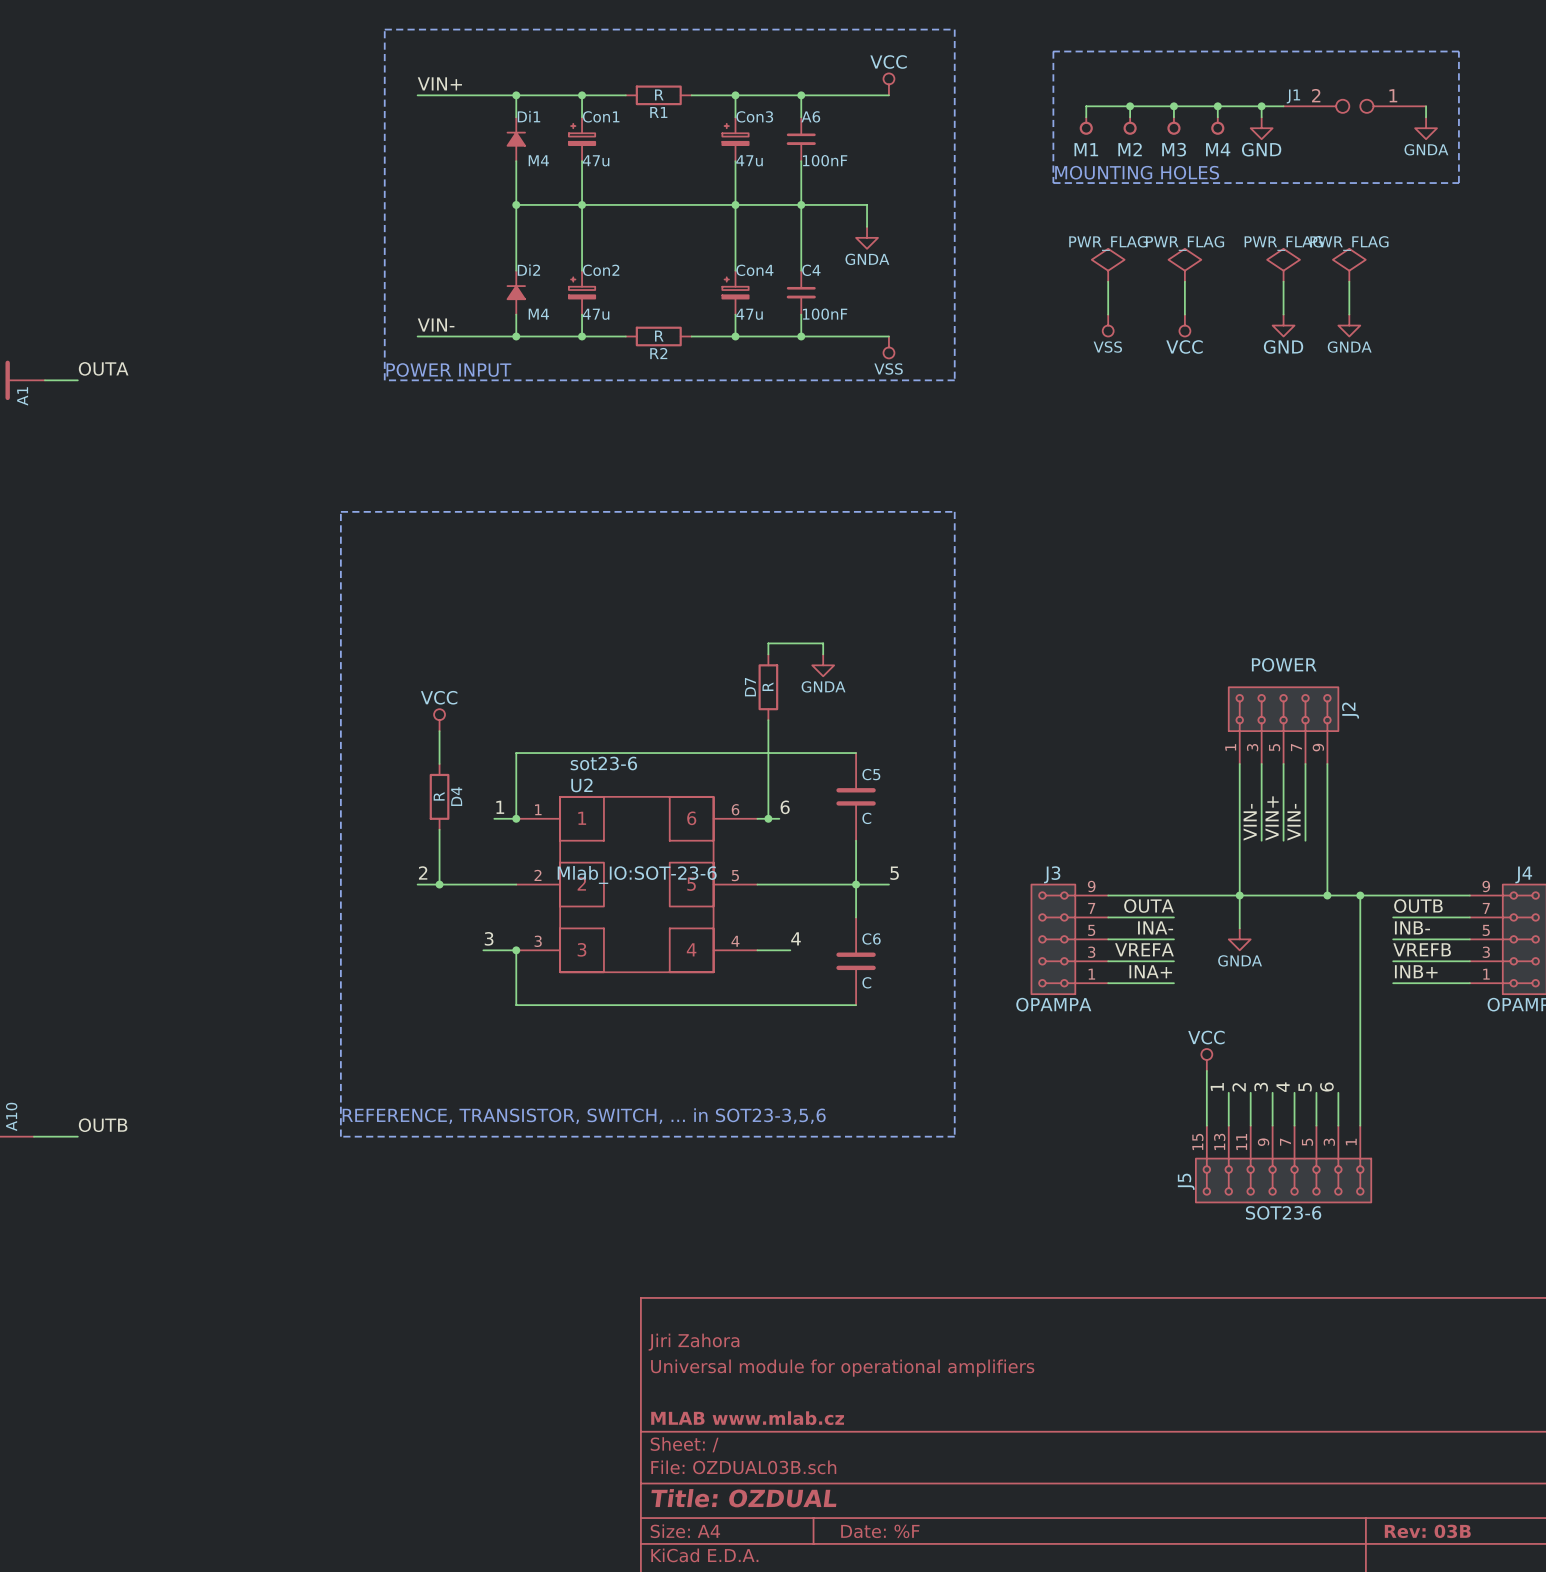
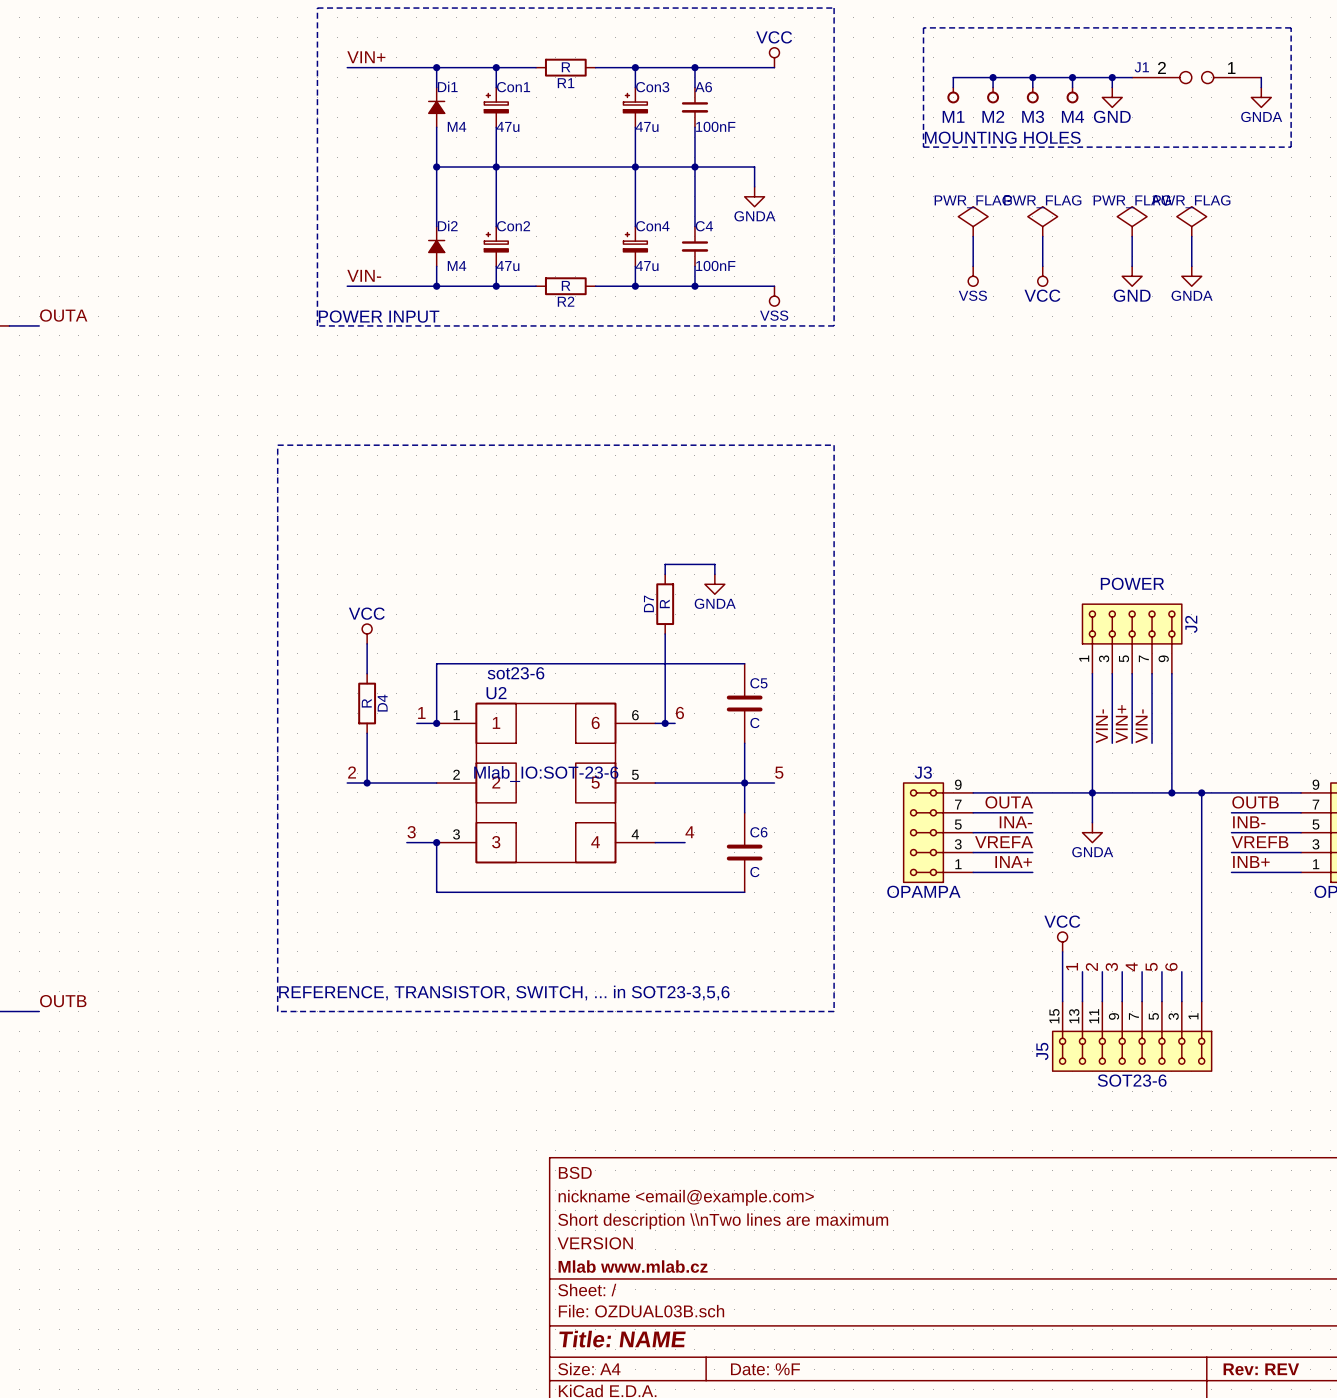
title block: none -> BSD (575, 1172)
title block: Jiri Zahora (693, 1342) -> nickname <email@example.com> (686, 1197)
title block: Universal module for operational amplifiers (842, 1368) -> Short description \\nTwo lines are maximum (723, 1221)
title block: none -> VERSION (595, 1243)
title block: MLAB www.mlab.cz (747, 1418) -> Mlab www.mlab.cz (633, 1266)
title block: Title: OZDUAL (743, 1498) -> Title: NAME (622, 1339)
title block: Rev: 03B (1427, 1531) -> Rev: REV (1261, 1369)

